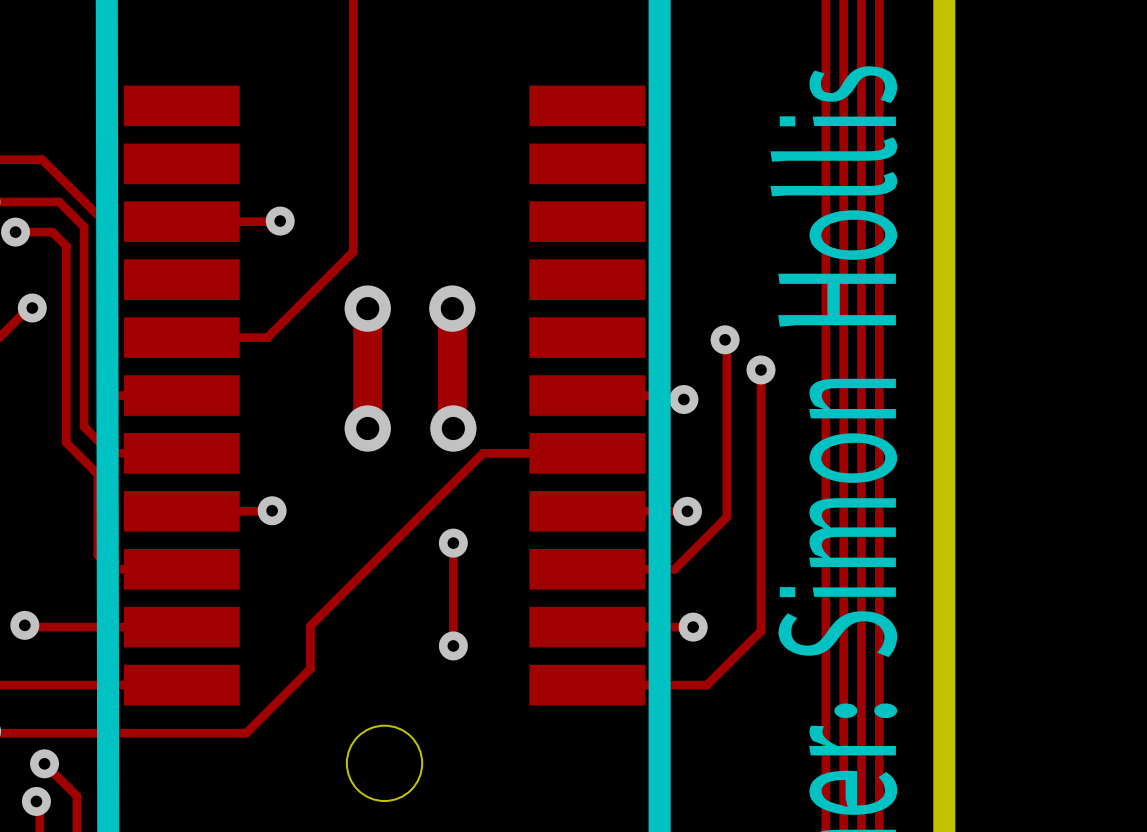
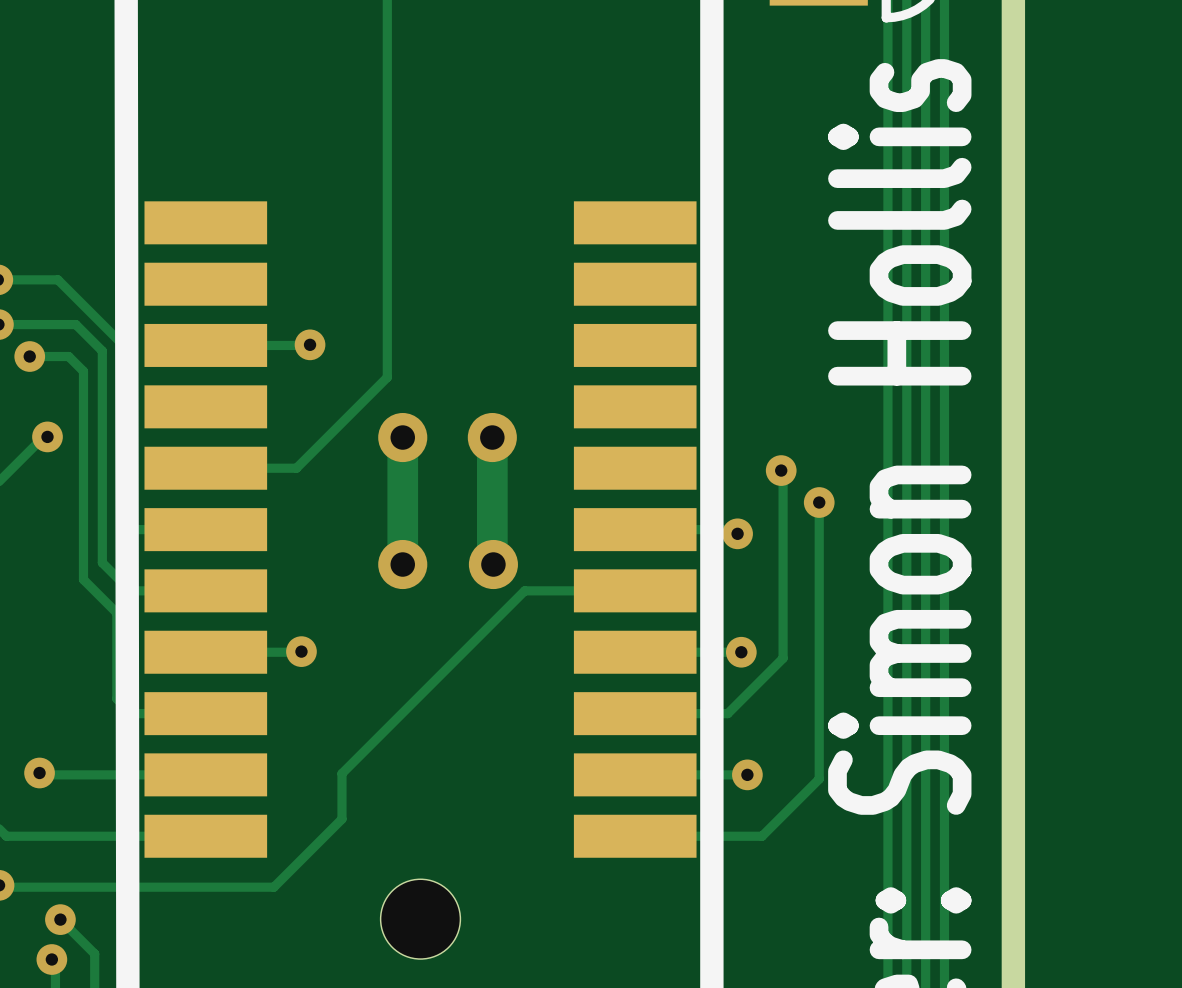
track: (453, 543) (453, 645) -> none
via: (453, 543) -> none
via: (453, 645) -> none

